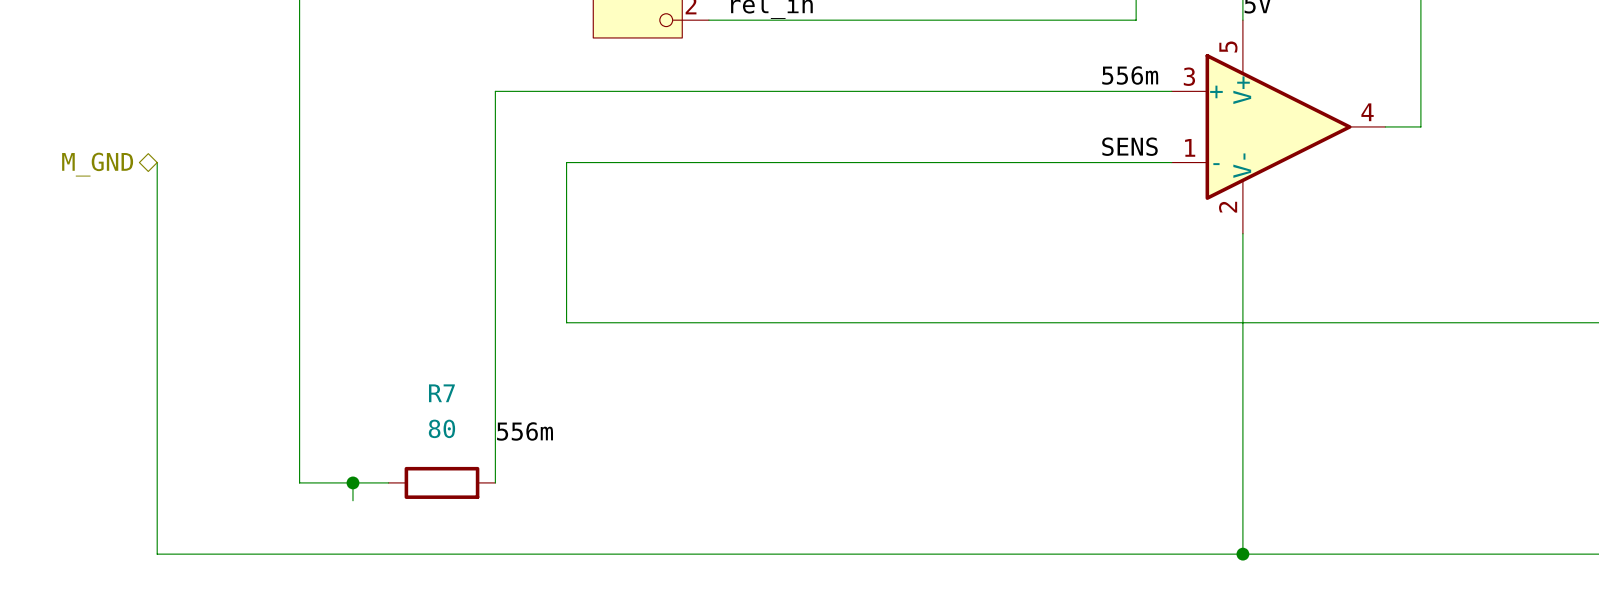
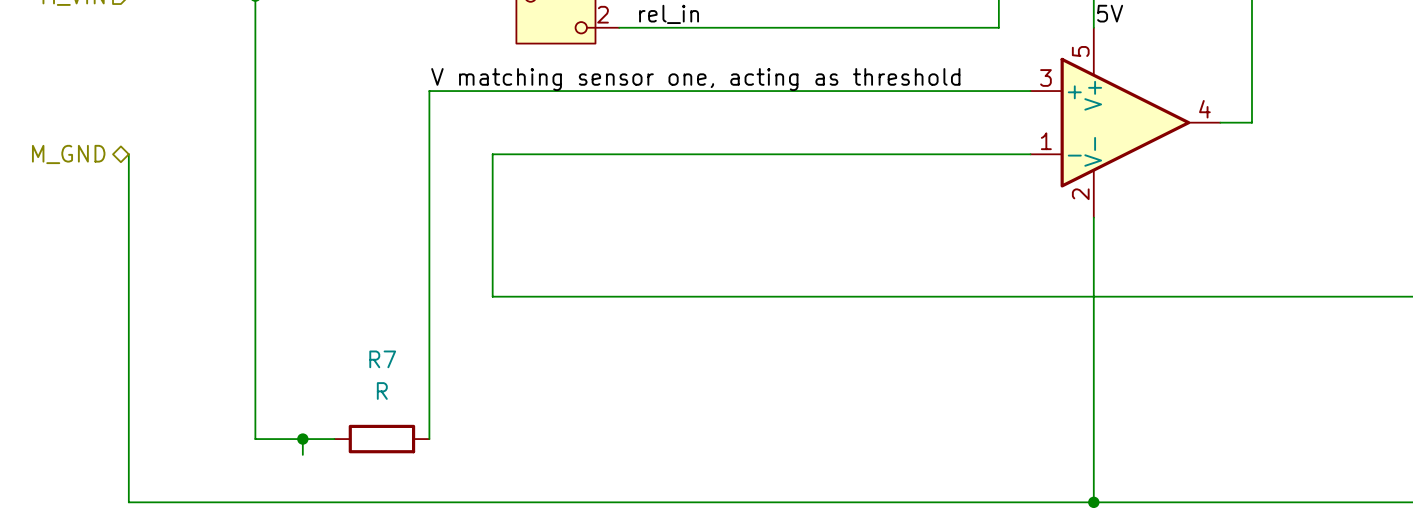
label: 556m (1130, 75) -> none
label: none -> V matching sensor one, acting as threshold (695, 79)
label: SENS (1129, 146) -> none
R7 value: 80 (441, 428) -> R (382, 391)
label: 556m (525, 431) -> none

